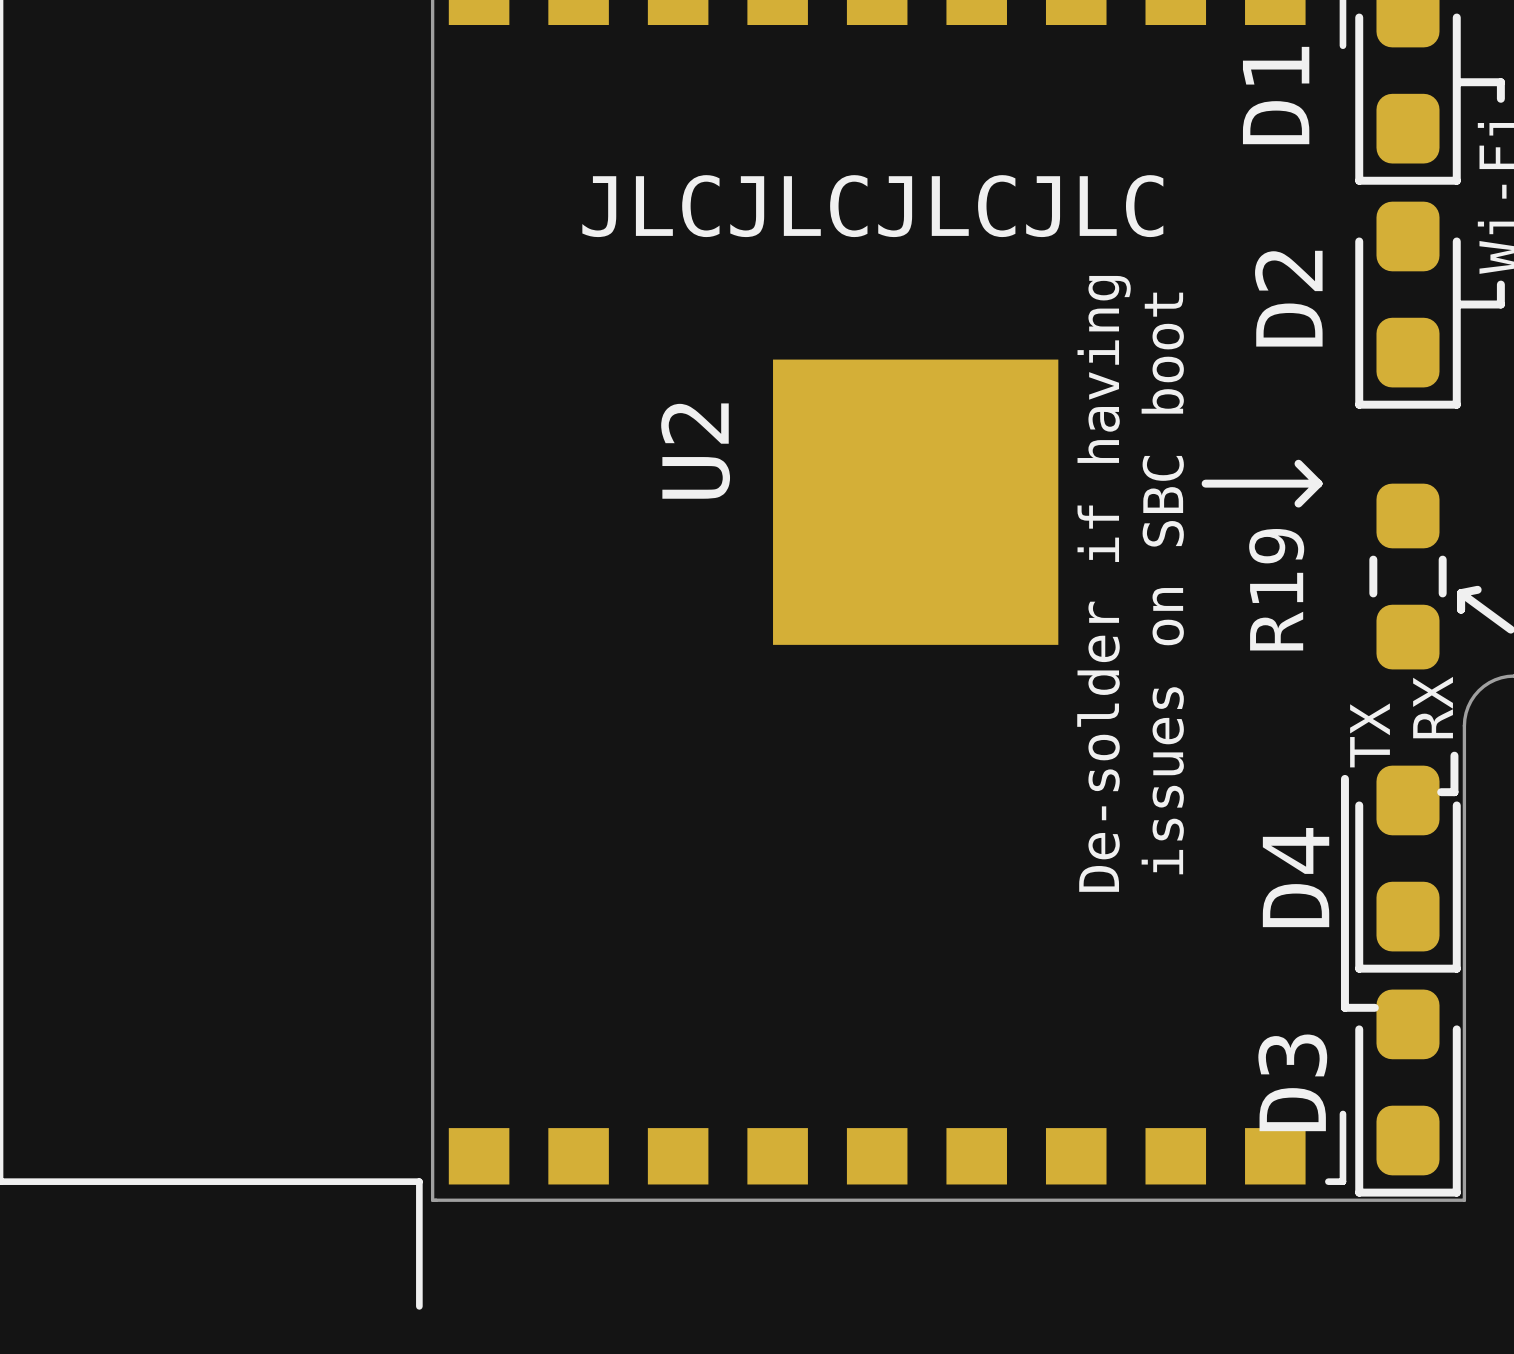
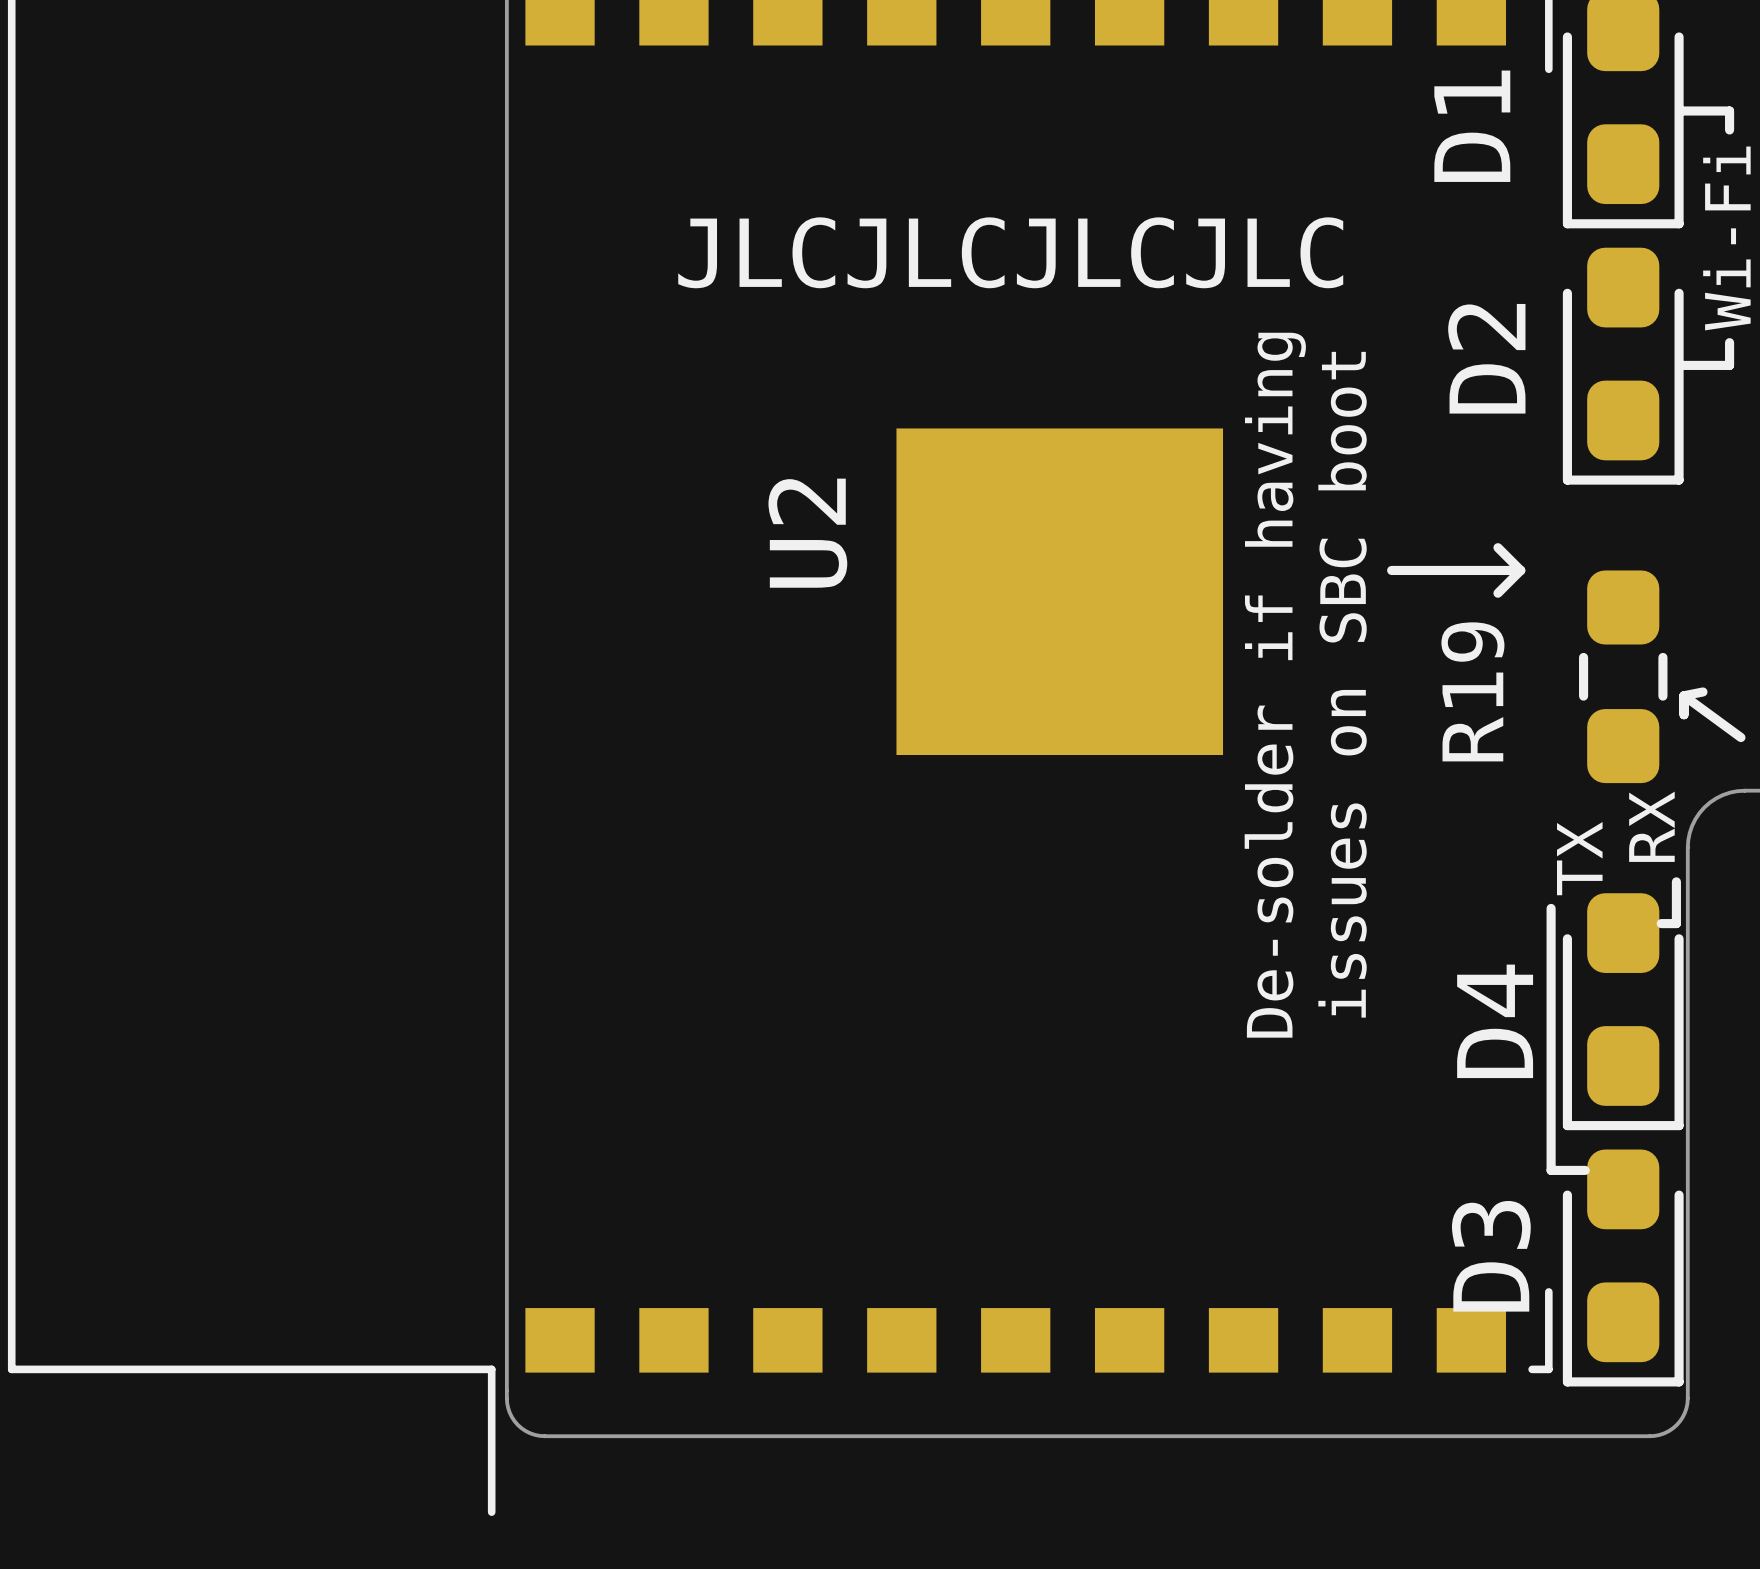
board edge: (432, 1200) (1464, 1200) -> (506, 1390) (508, 1408) (514, 1421) (530, 1433) (544, 1436) (1649, 1436) (1664, 1433) (1679, 1421) (1686, 1408) (1687, 1390)

